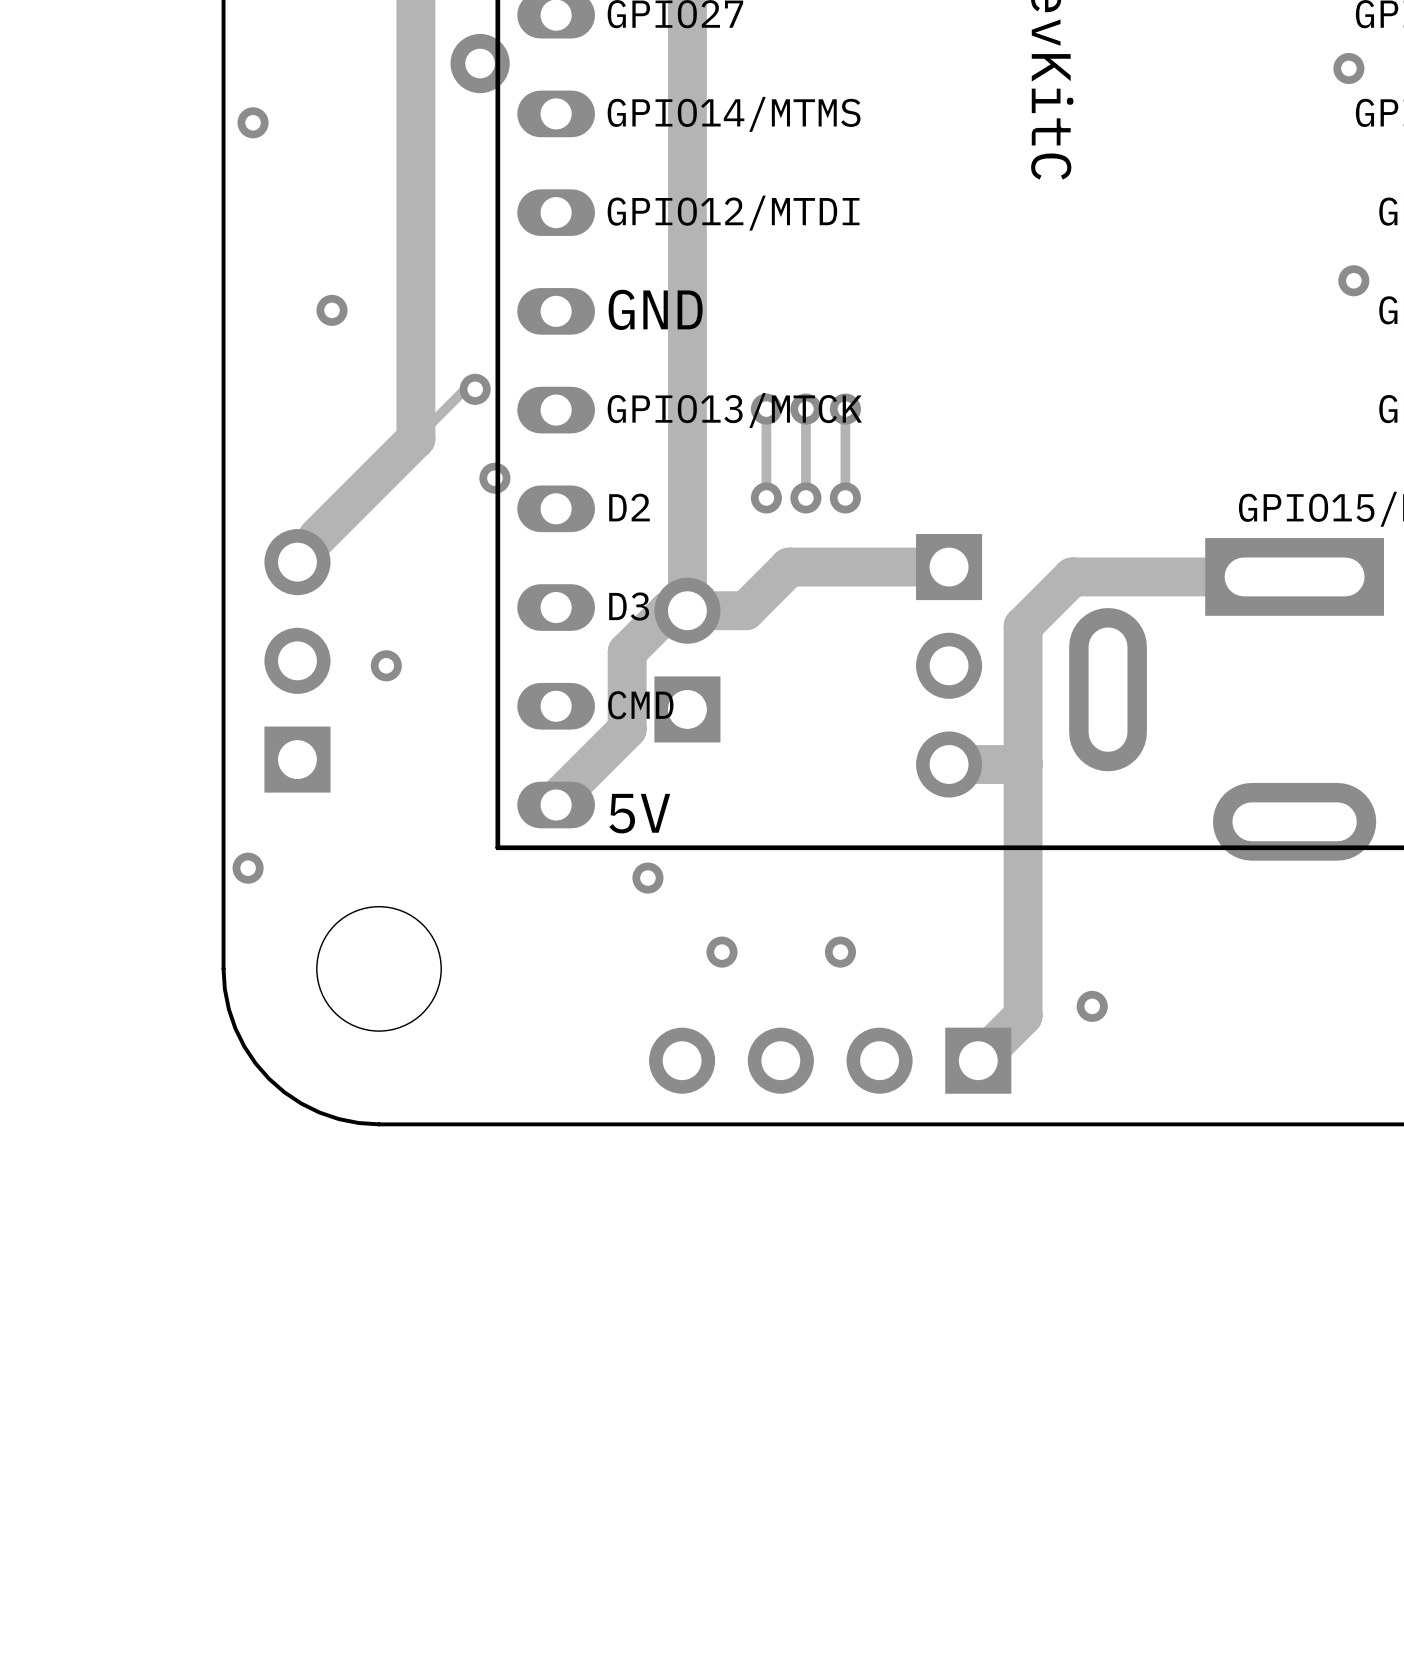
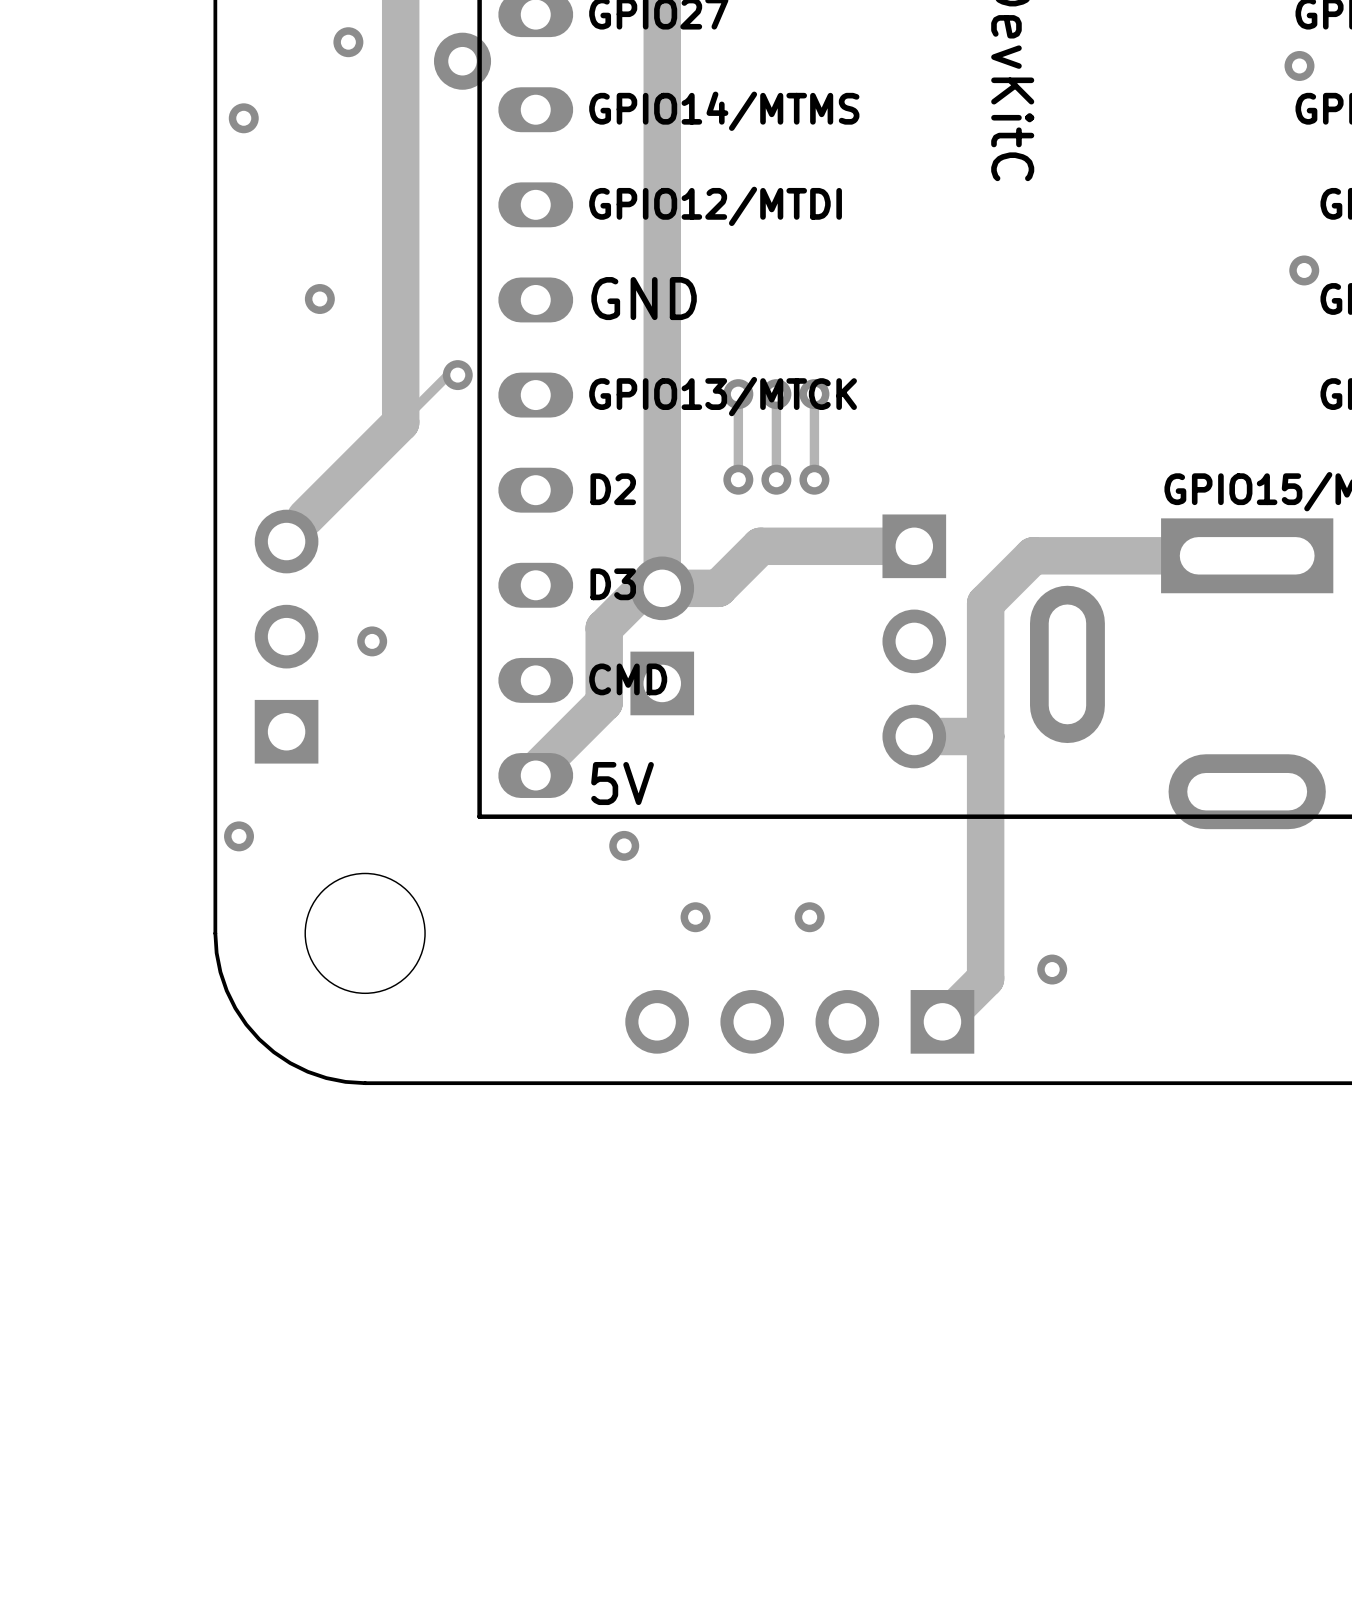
via: none -> (348, 42)
via: (494, 478) -> none

